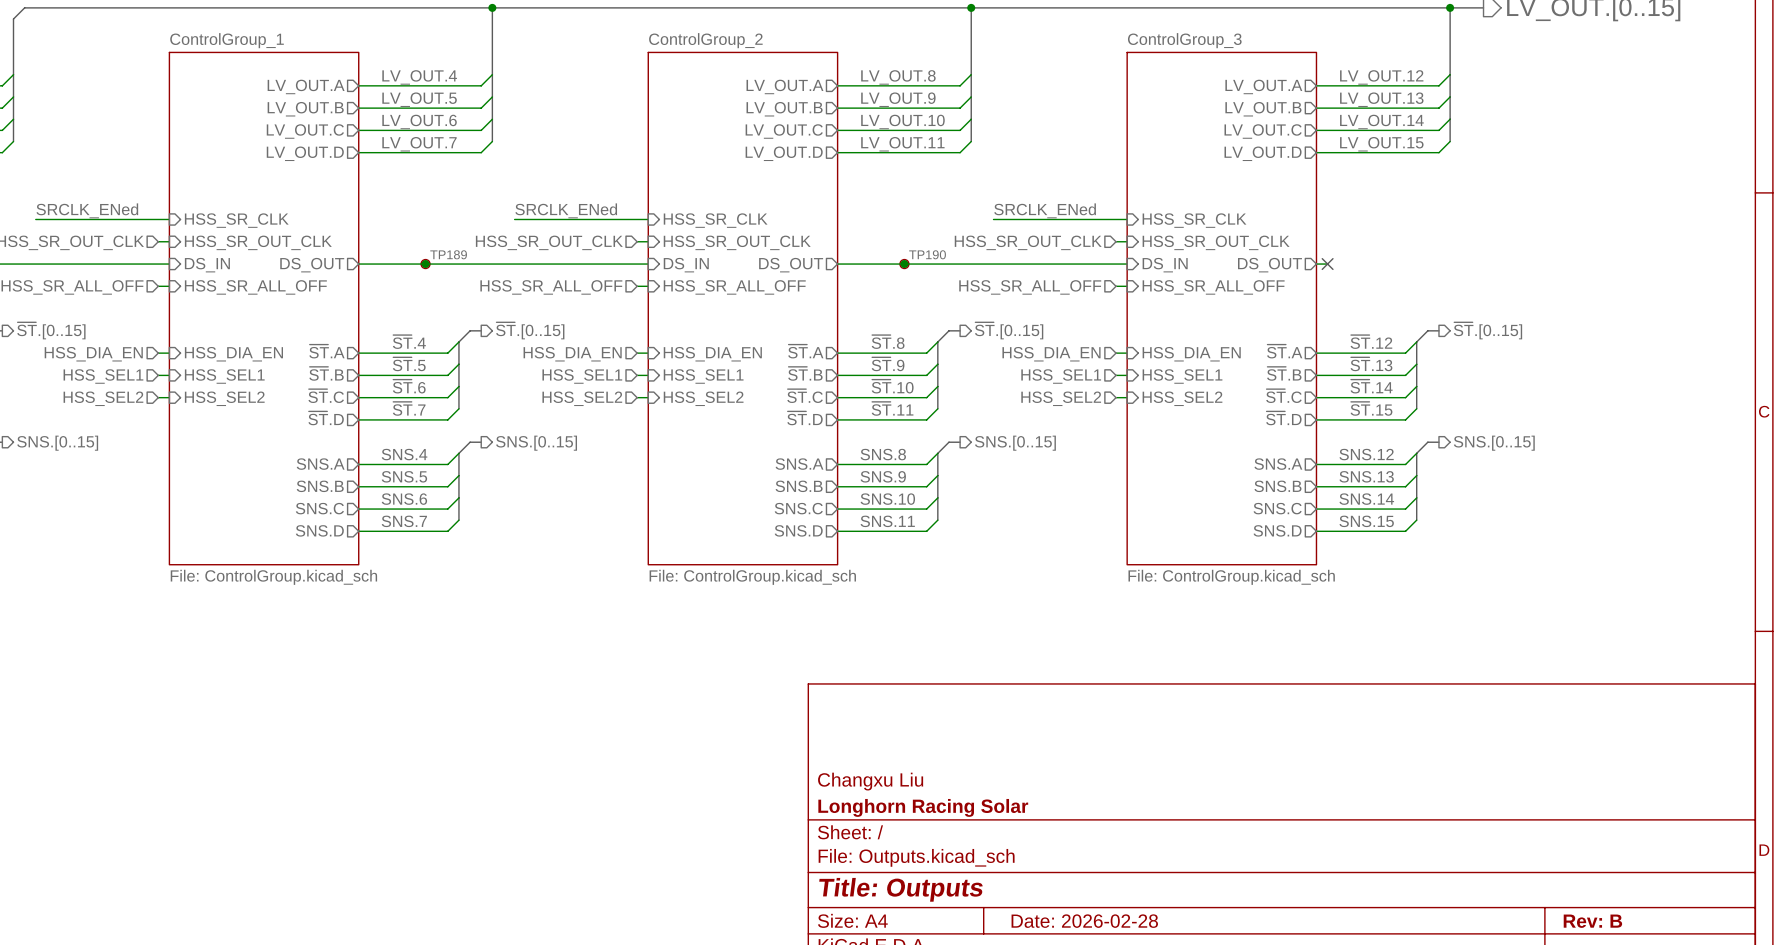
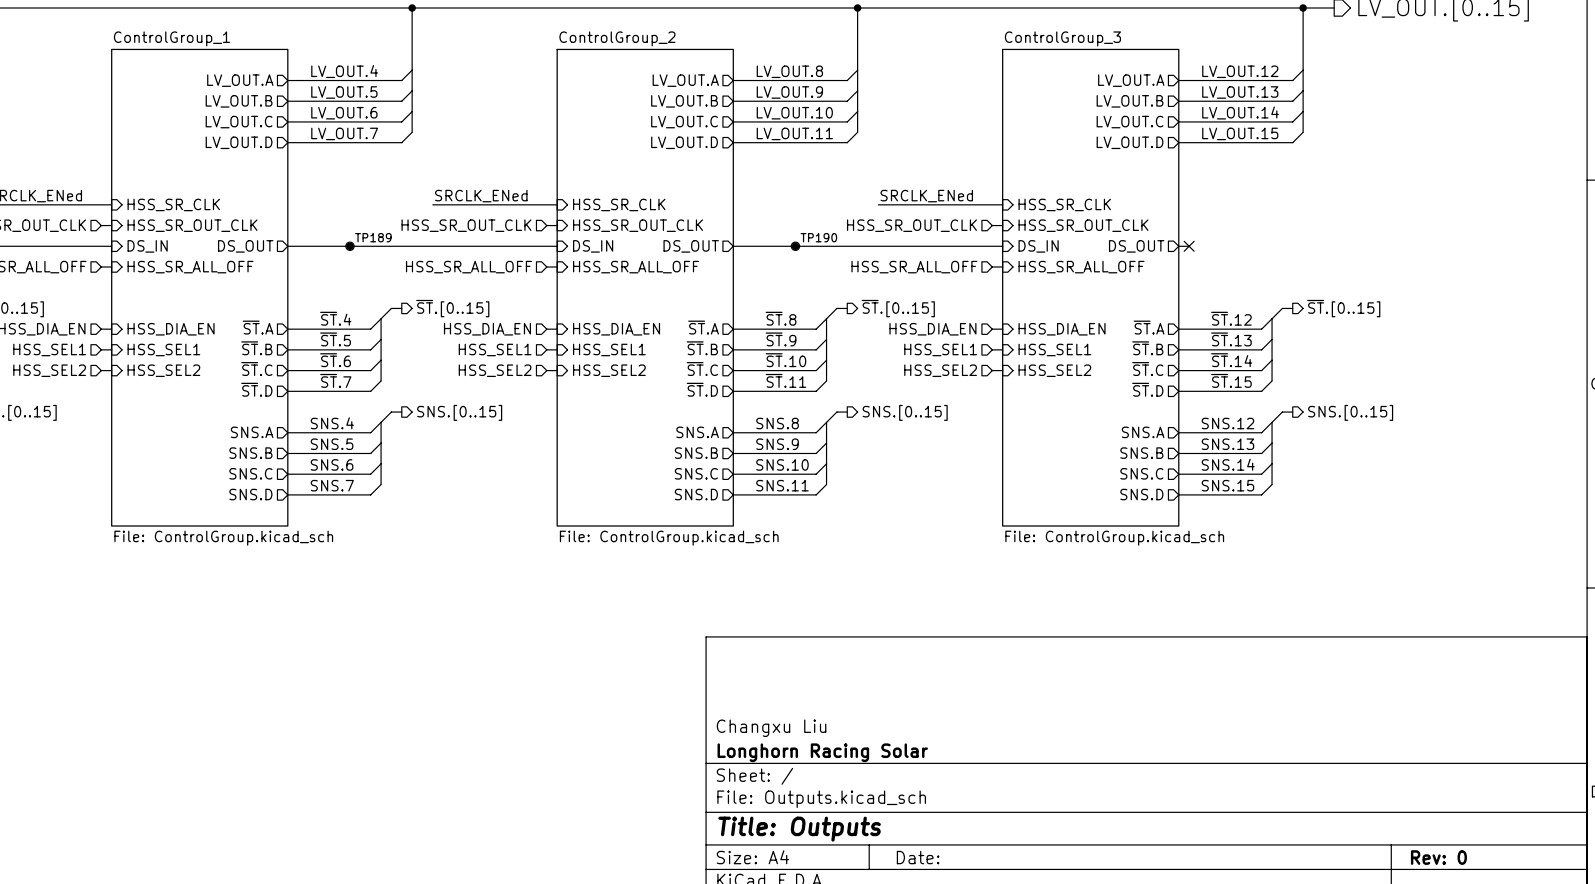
title block: Date: 2026-02-28 (1084, 921) -> Date: (918, 857)
title block: Rev: B (1592, 921) -> Rev: 0 (1438, 857)

